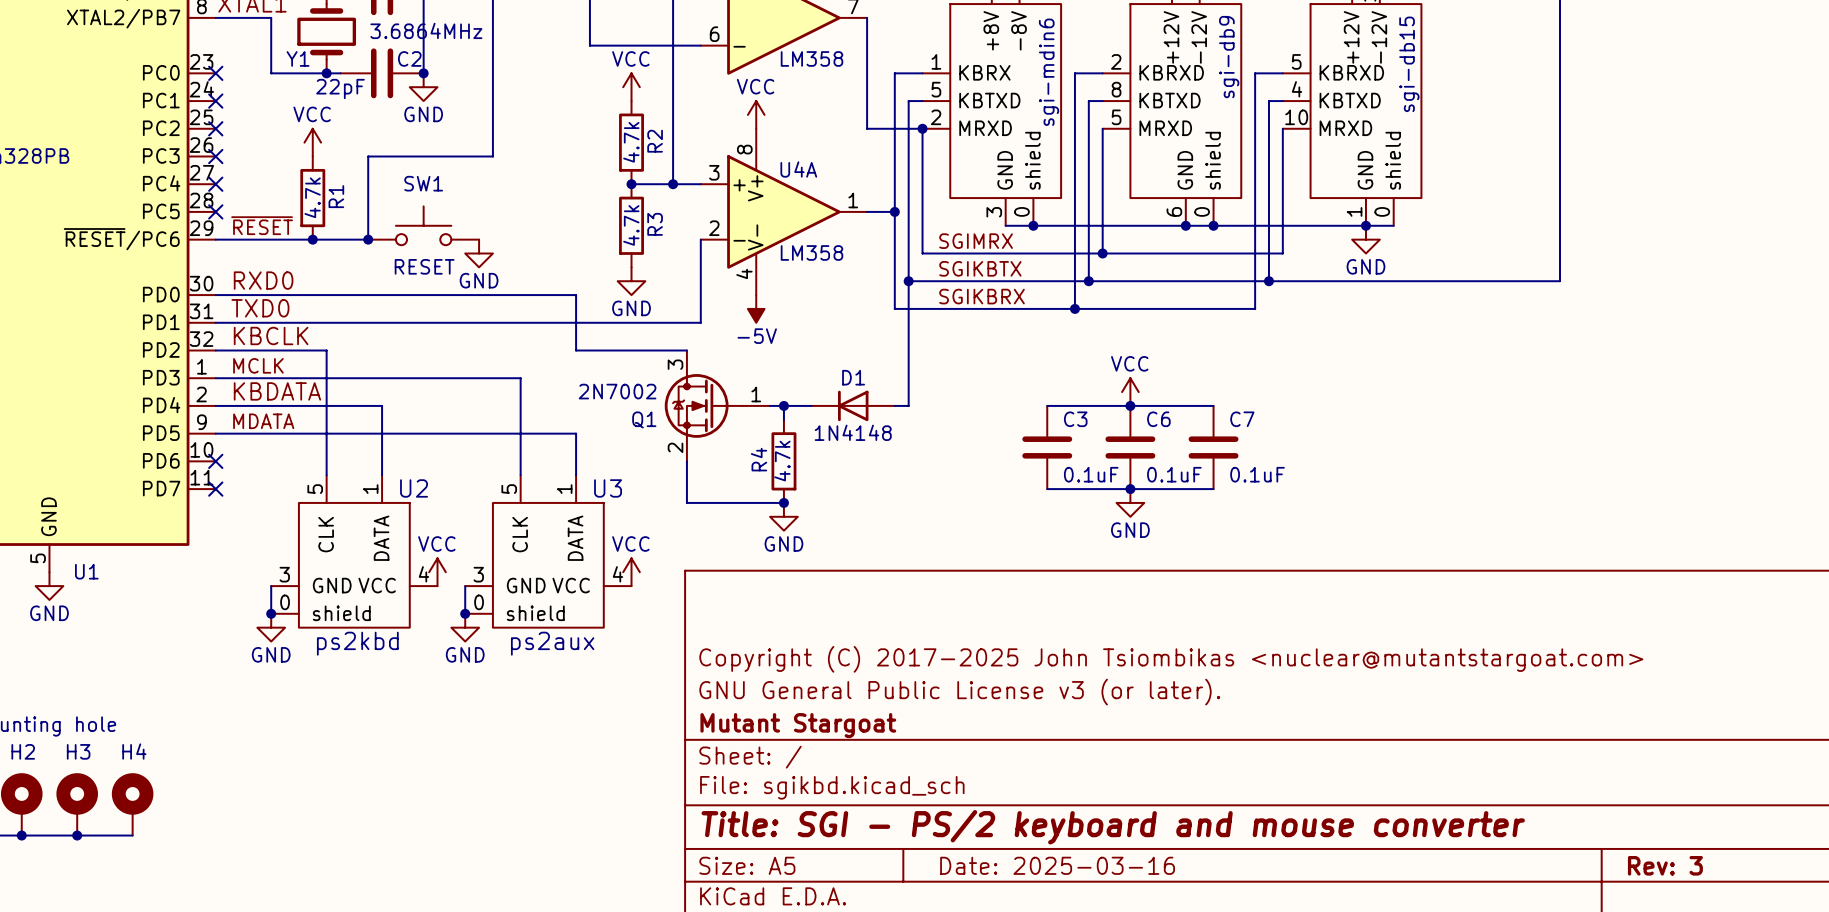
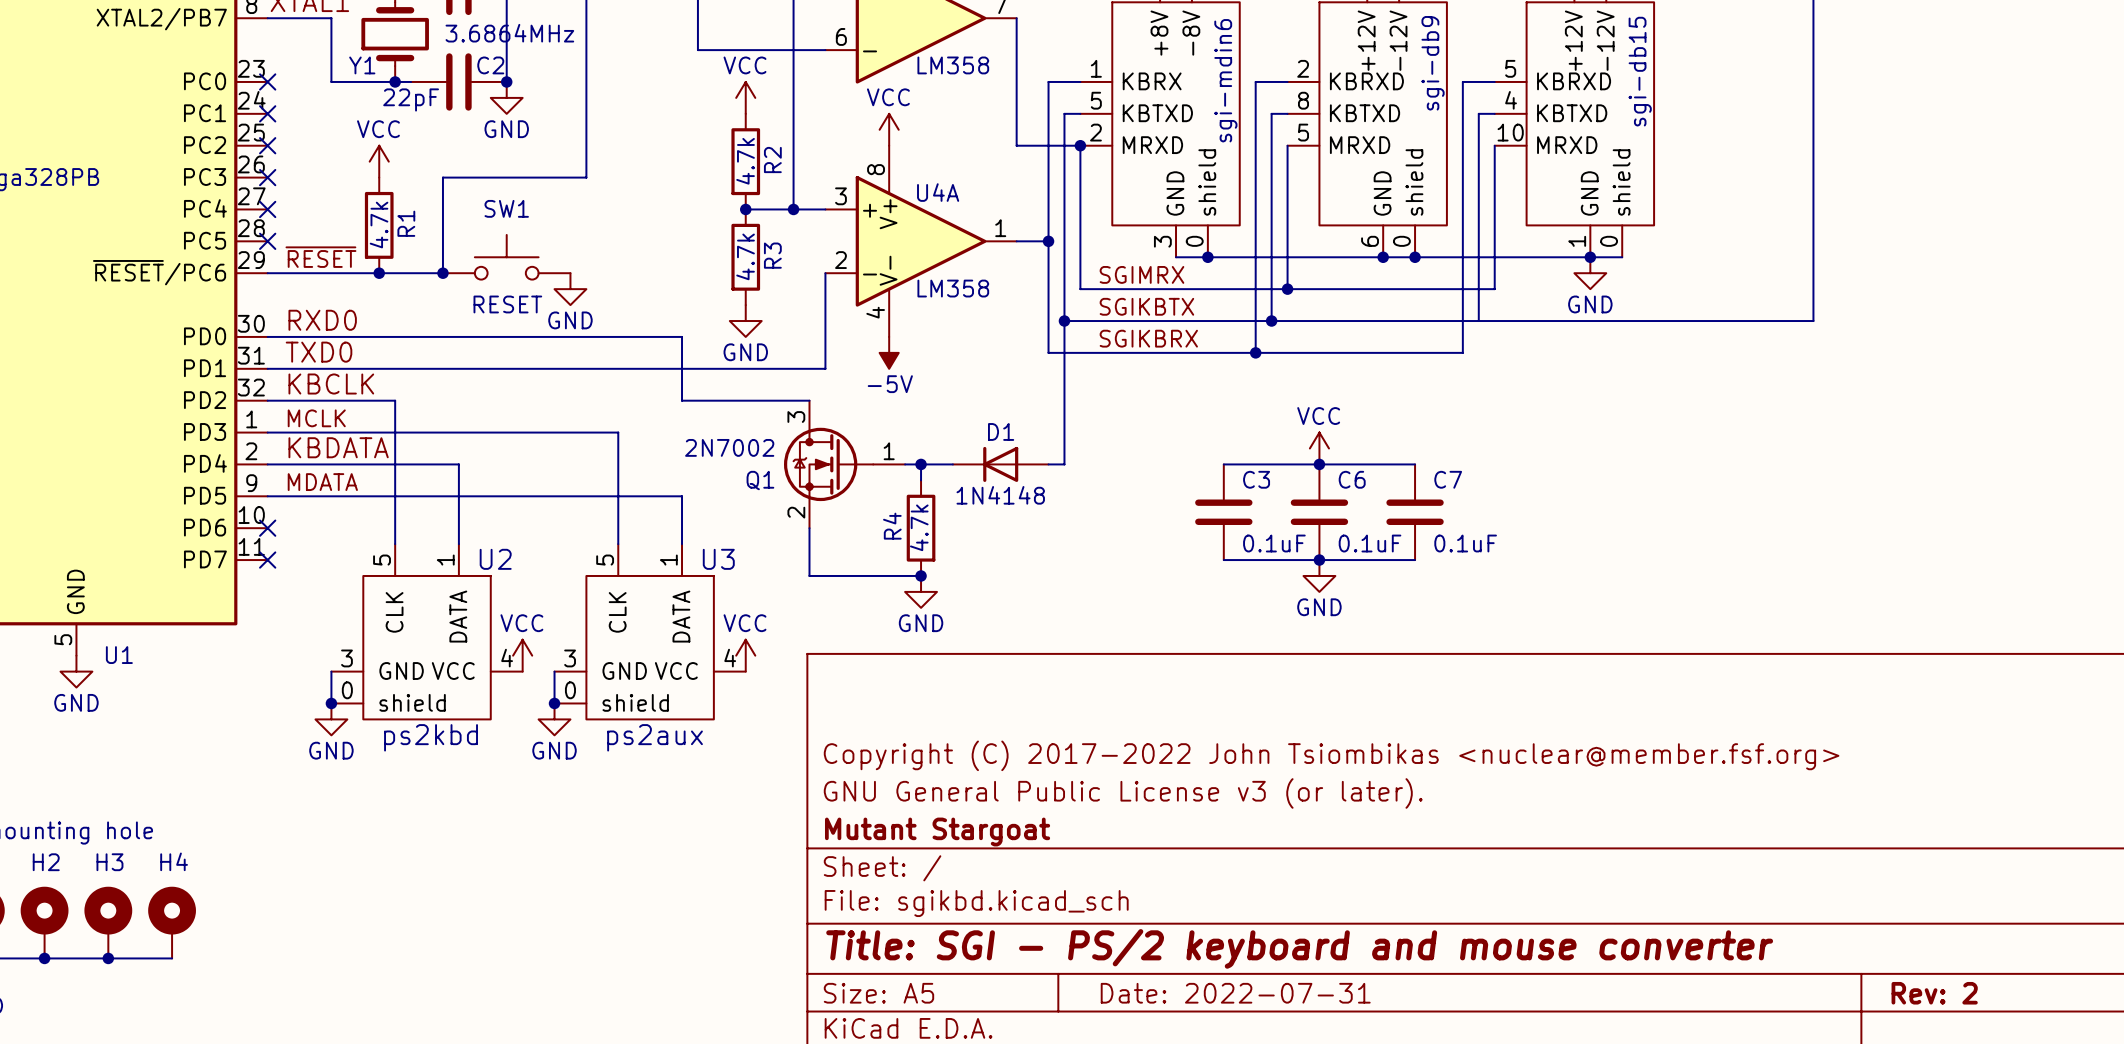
junction: (1268, 281) -> none
title block: Copyright (C) 2017-2025 John Tsiombikas <nuclear@mutantstargoat.com> (1171, 659) -> Copyright (C) 2017-2022 John Tsiombikas <nuclear@member.fsf.org> (1331, 755)
title block: Date: 2025-03-16 (1057, 865) -> Date: 2022-07-31 (1235, 993)
title block: Rev: 3 (1665, 865) -> Rev: 2 (1934, 993)

